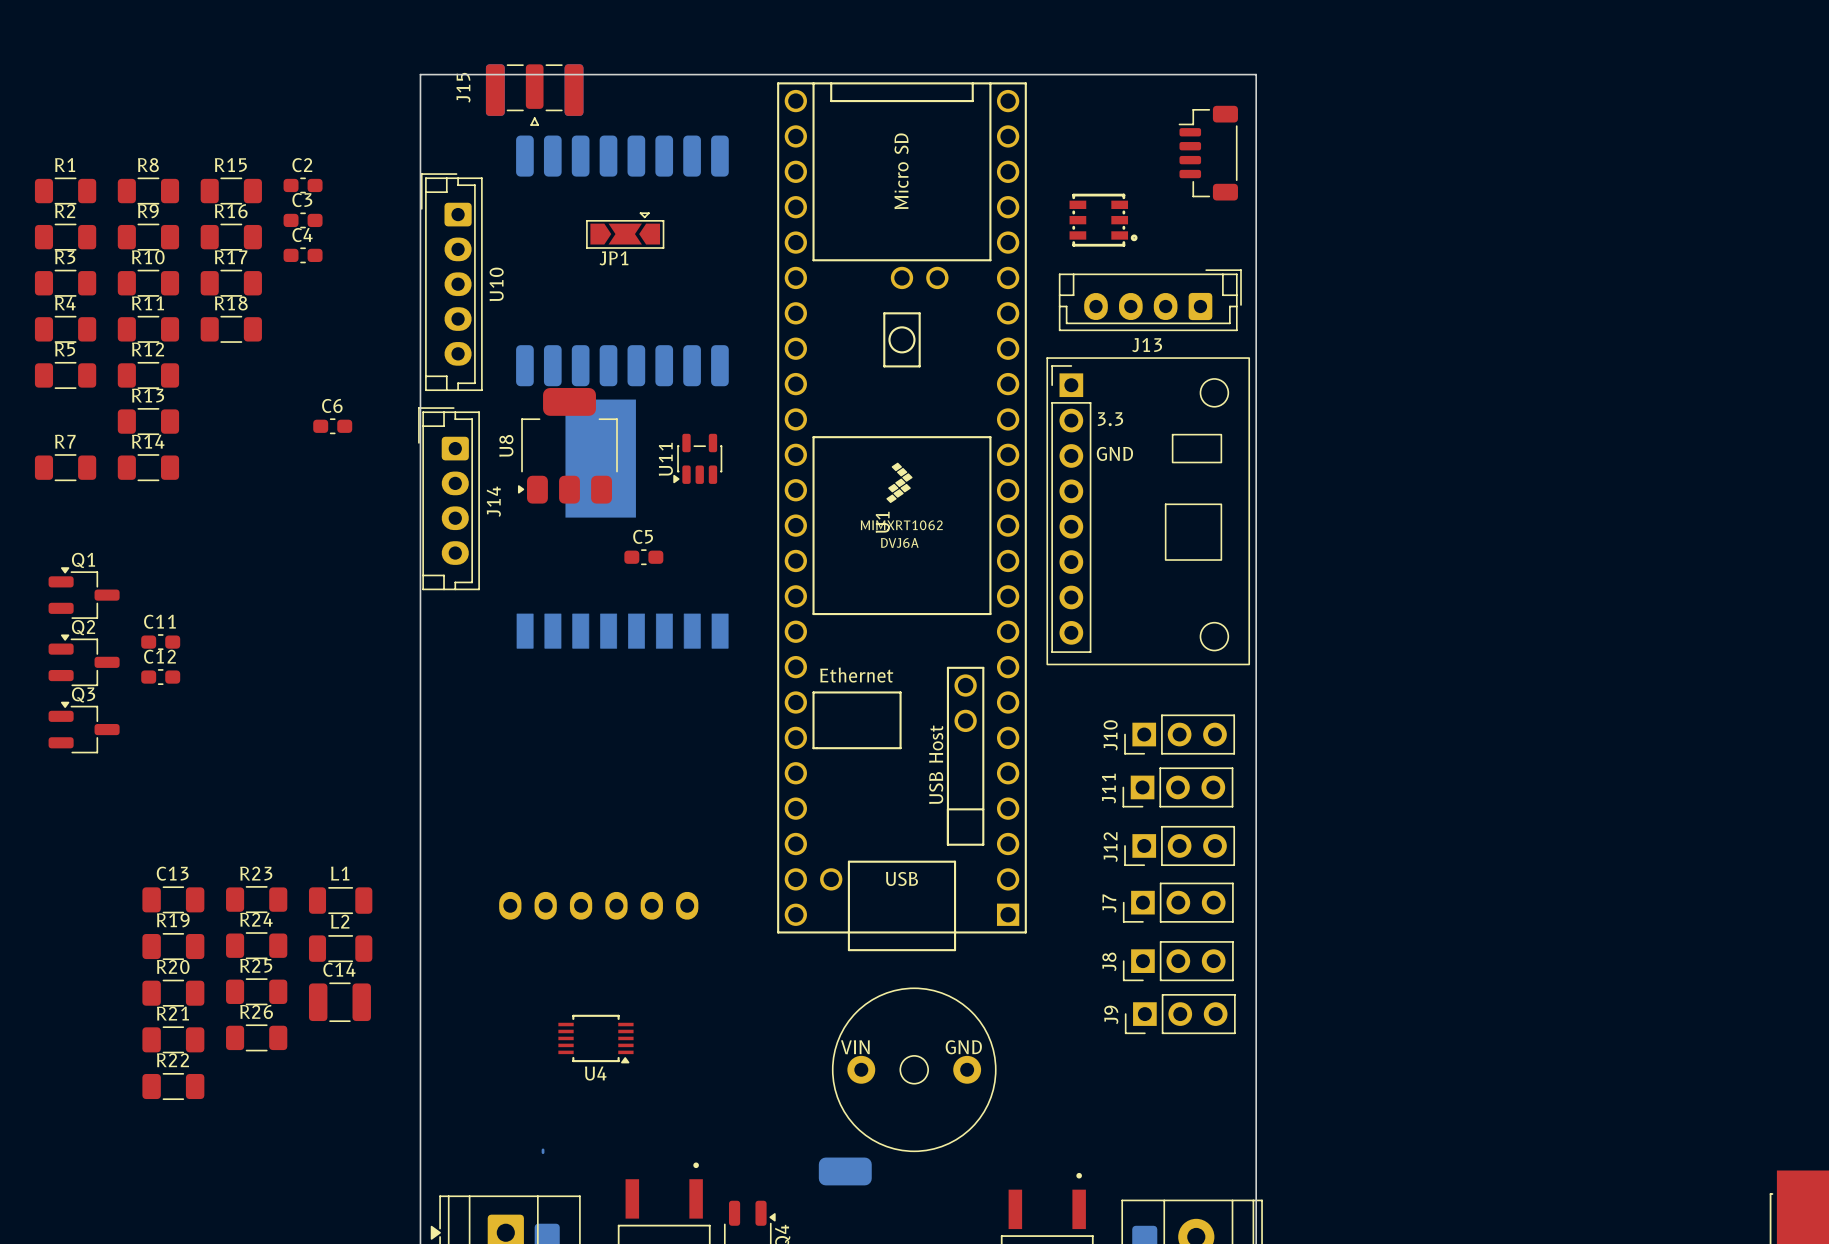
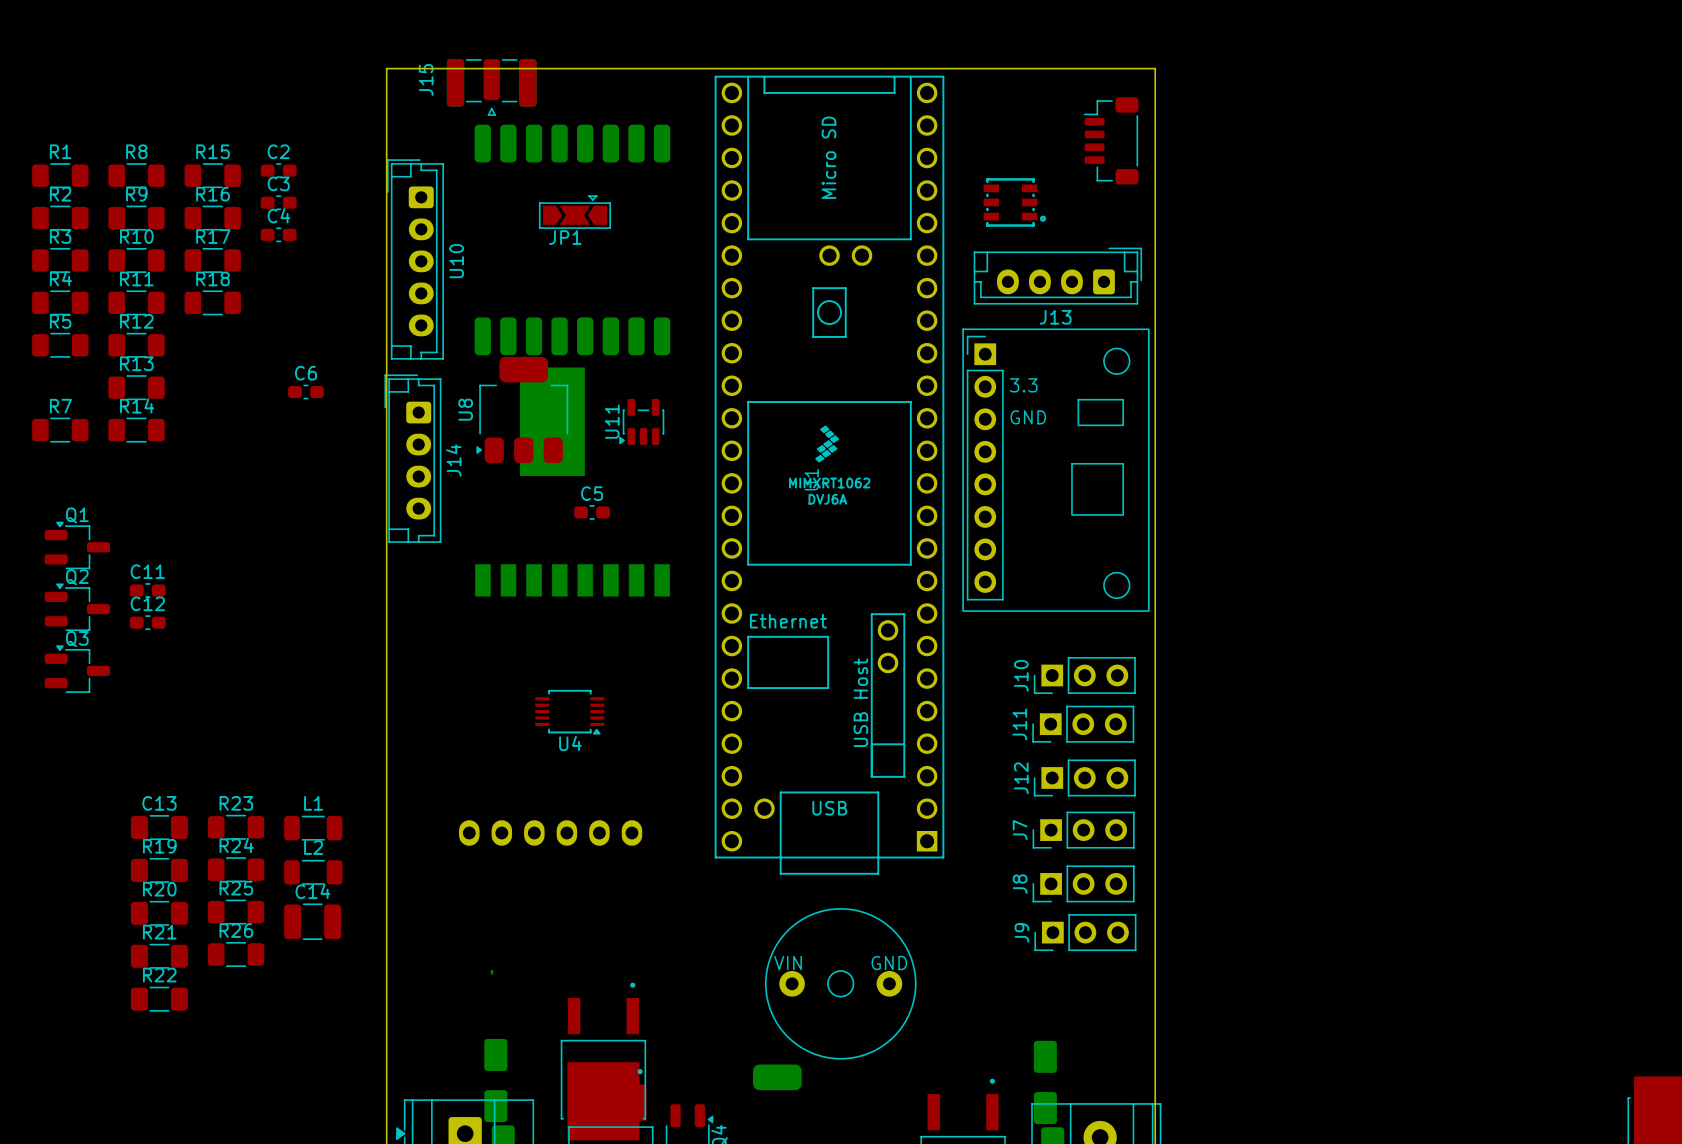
U4 position: (595, 1039) -> (569, 712)
bottom track: (543, 1149) (543, 1152) -> (492, 971) (492, 973)
part: none -> (603, 1061)
part: none -> (495, 1080)
part: none -> (1045, 1082)

